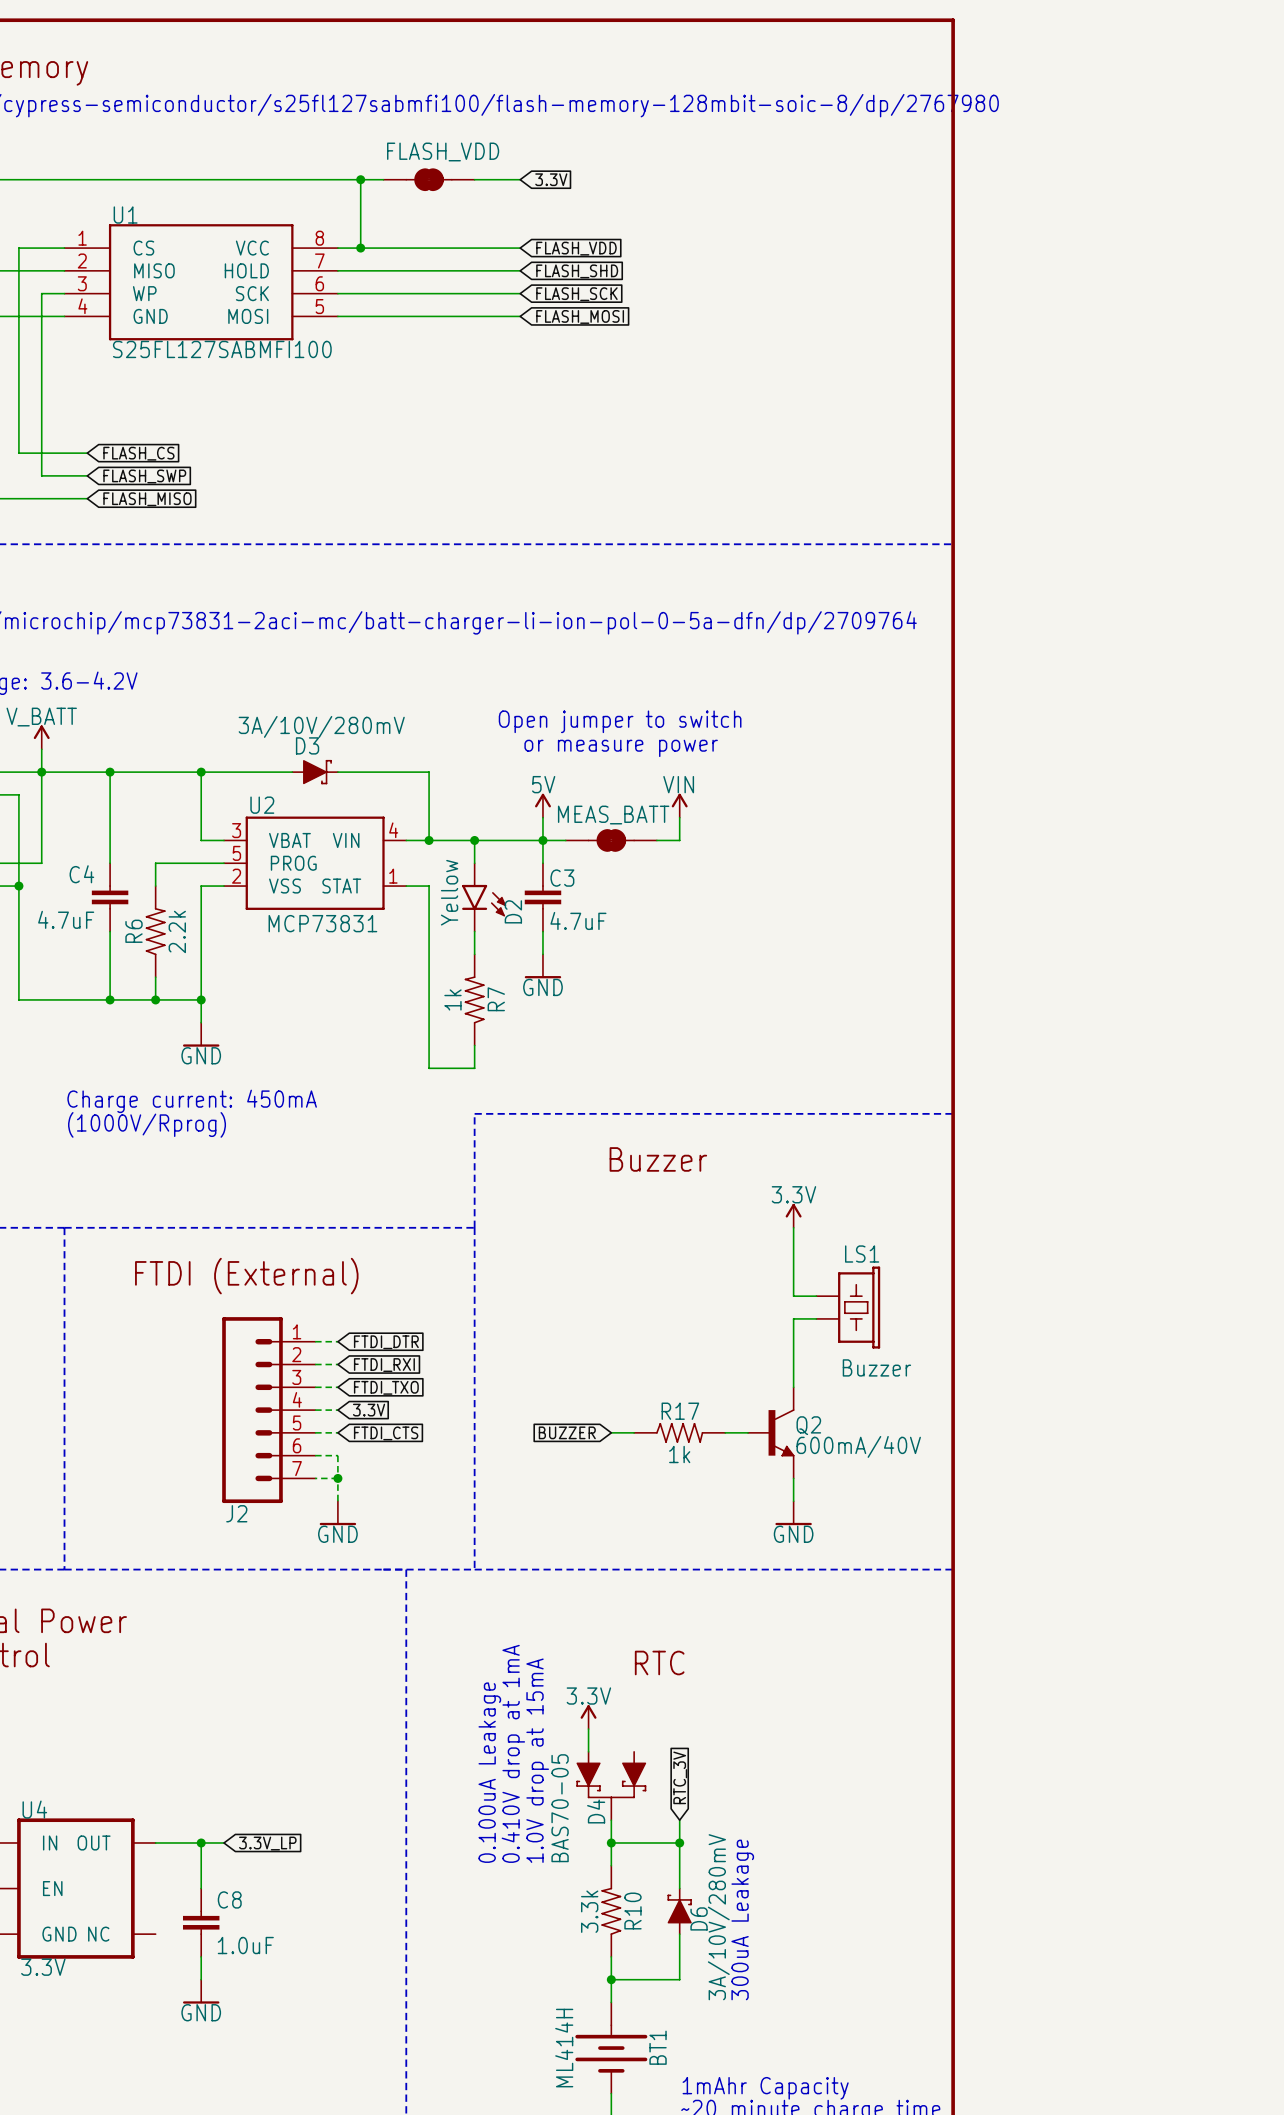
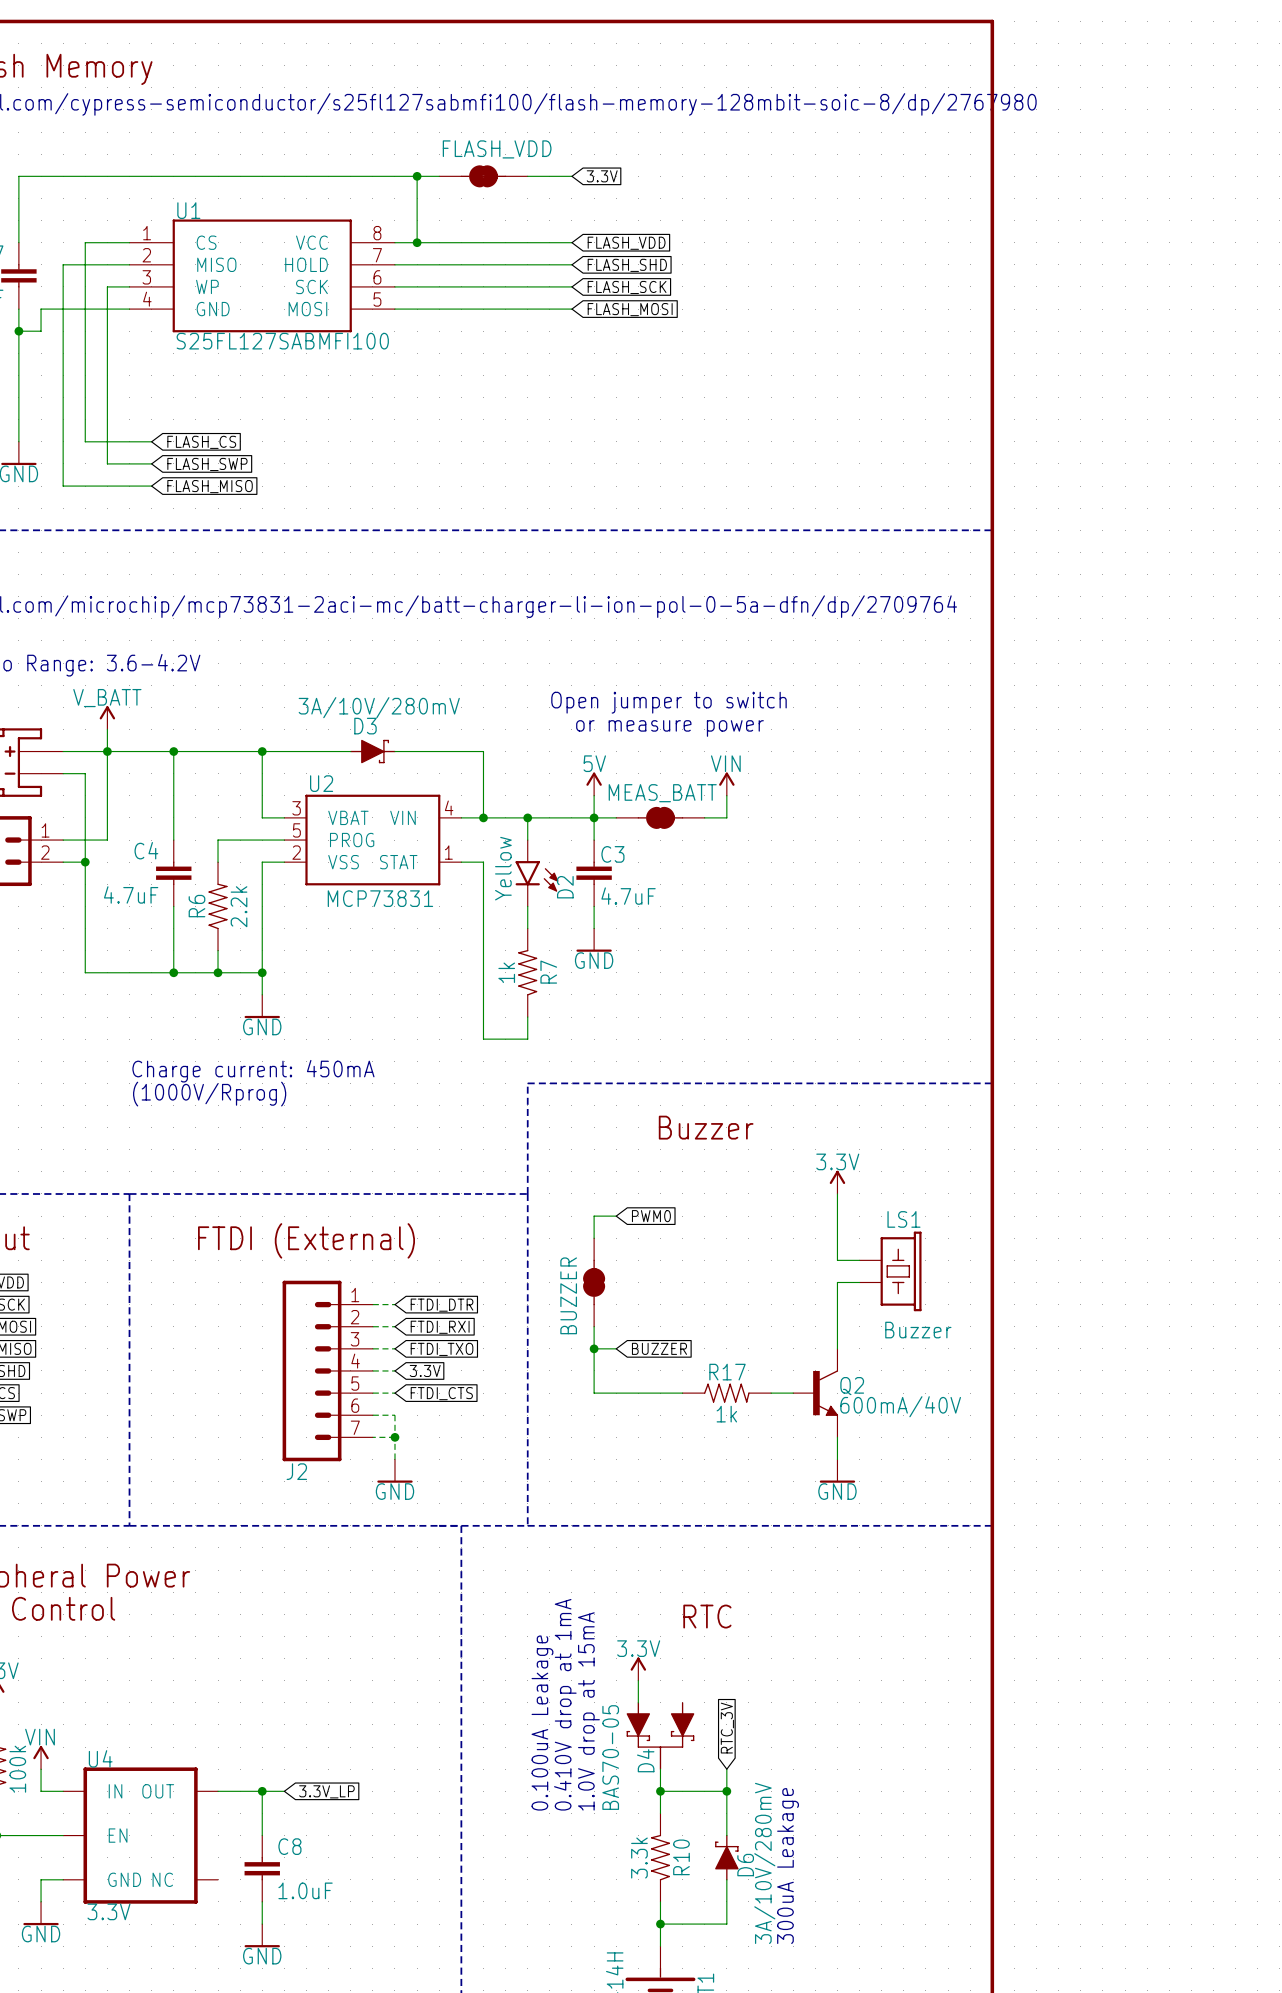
wire: none -> (616, 1216) (594, 1216) (594, 1238)
global label: none -> PWM0 (651, 1216)
BUZZER: none -> (594, 1282)
wire: none -> (594, 1326) (594, 1393) (660, 1393)
wire: none -> (594, 1348) (616, 1348)
junction: none -> (594, 1348)
global label rotation: 0° (567, 1432) -> 180° (659, 1348)

